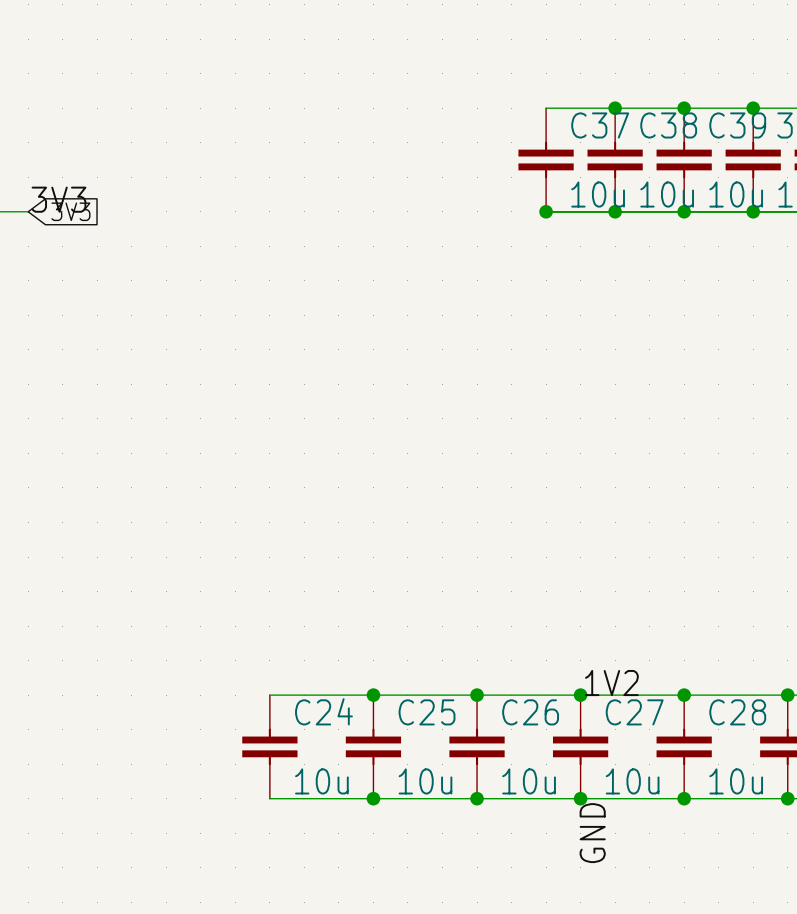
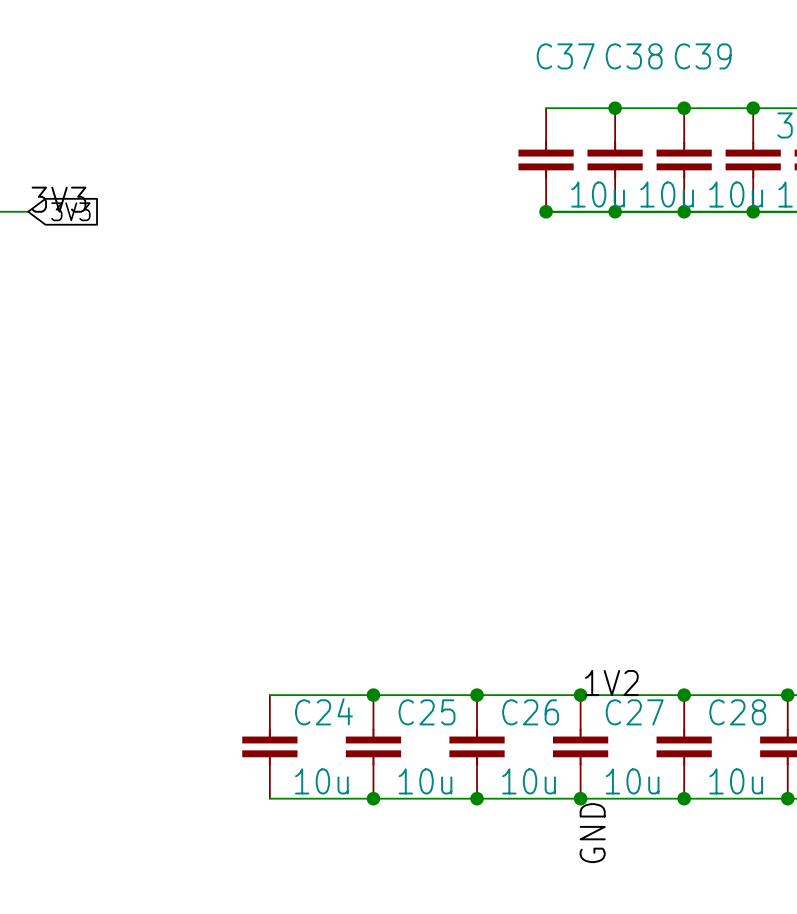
C37 name position: C37 (600, 125) -> C37 (565, 56)
C38 name position: C38 (668, 125) -> C38 (634, 56)
C39 name position: C39 (737, 125) -> C39 (703, 56)

